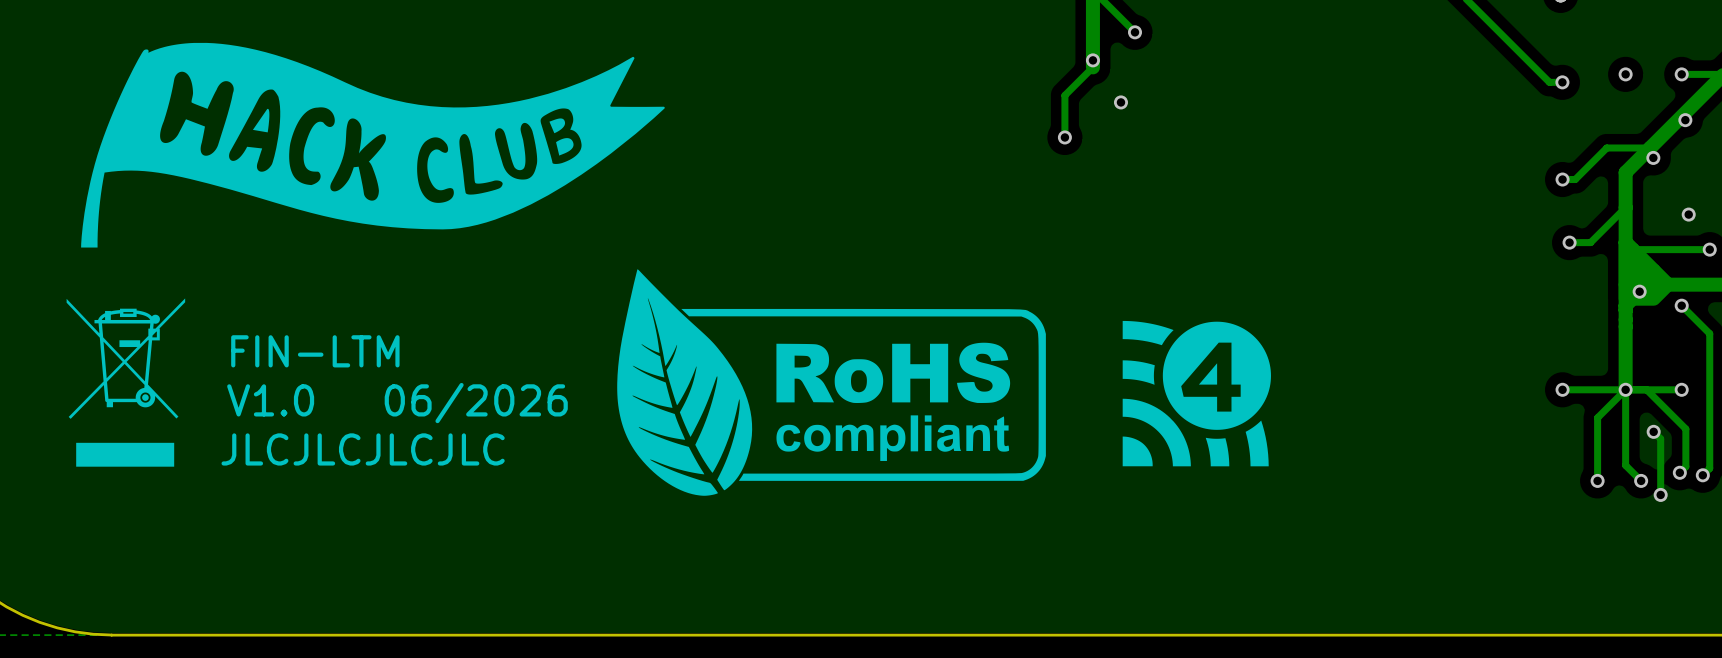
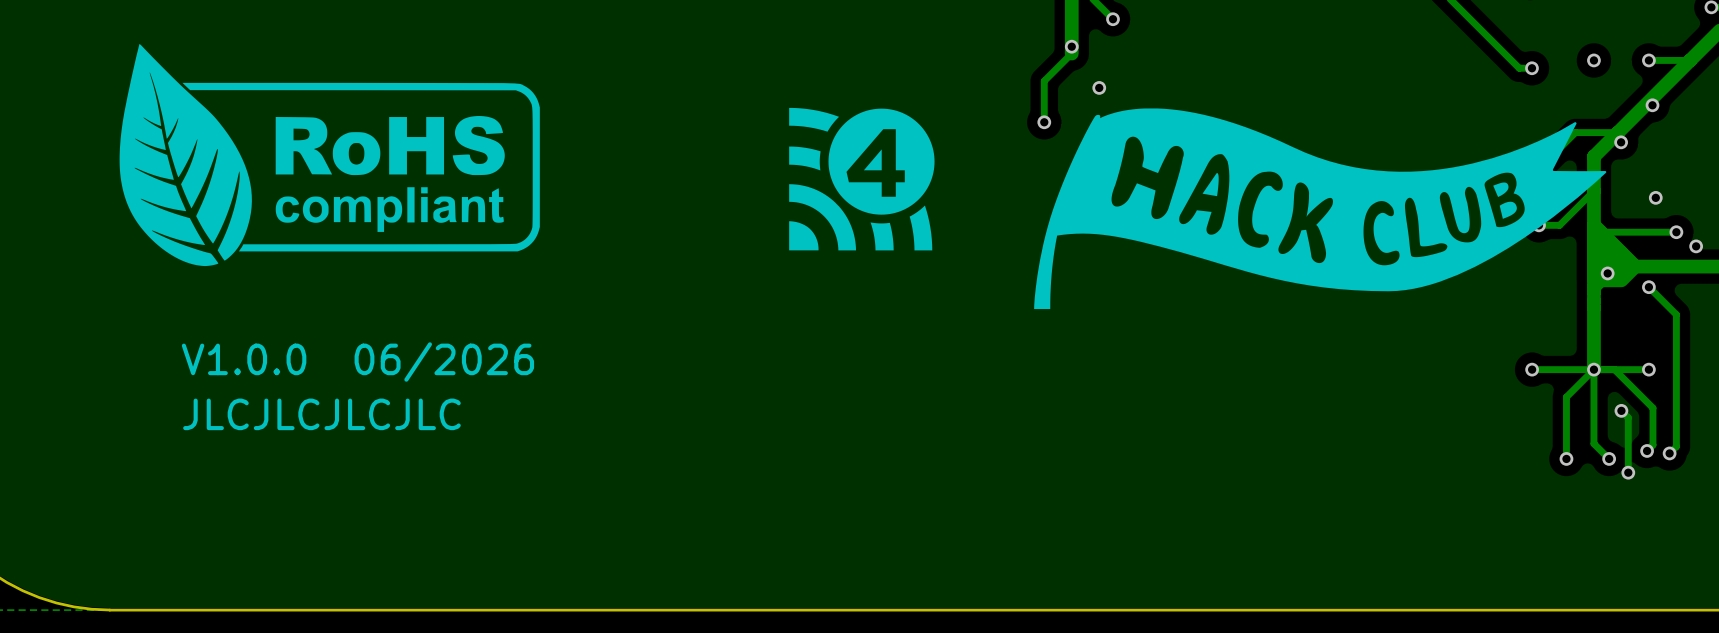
drawing: [81, 42, 665, 248] -> none
drawing: none -> [182, 82, 540, 252]
drawing: none -> [1034, 108, 1607, 310]
drawing: [66, 298, 186, 467] -> none
drawing: [681, 308, 1046, 481] -> none
drawing position: (1148, 333) -> (814, 119)
text: FIN-LTM (315, 351) -> none
drawing position: (983, 372) -> (478, 145)
drawing position: (1138, 372) -> (804, 158)
drawing position: (805, 373) -> (303, 145)
drawing position: (920, 373) -> (416, 145)
drawing position: (1208, 373) -> (872, 159)
drawing position: (1216, 375) -> (881, 161)
drawing position: (858, 381) -> (356, 153)
drawing position: (684, 382) -> (185, 155)
text: V1.0 06/2026 (397, 403) -> V1.0.0 06/2026 (357, 362)
drawing position: (928, 418) -> (424, 190)
drawing position: (1156, 432) -> (822, 217)
drawing position: (914, 433) -> (410, 204)
drawing position: (1001, 434) -> (496, 205)
drawing position: (854, 437) -> (352, 209)
drawing position: (978, 437) -> (473, 209)
drawing position: (788, 438) -> (287, 209)
drawing position: (817, 438) -> (315, 209)
drawing position: (928, 438) -> (424, 209)
drawing position: (949, 438) -> (445, 209)
drawing position: (892, 442) -> (389, 214)
drawing position: (1257, 443) -> (920, 227)
text position: JLCJLCJLCJLC (363, 449) -> JLCJLCJLCJLC (321, 414)
drawing position: (1137, 451) -> (803, 235)
drawing position: (1217, 452) -> (882, 236)

